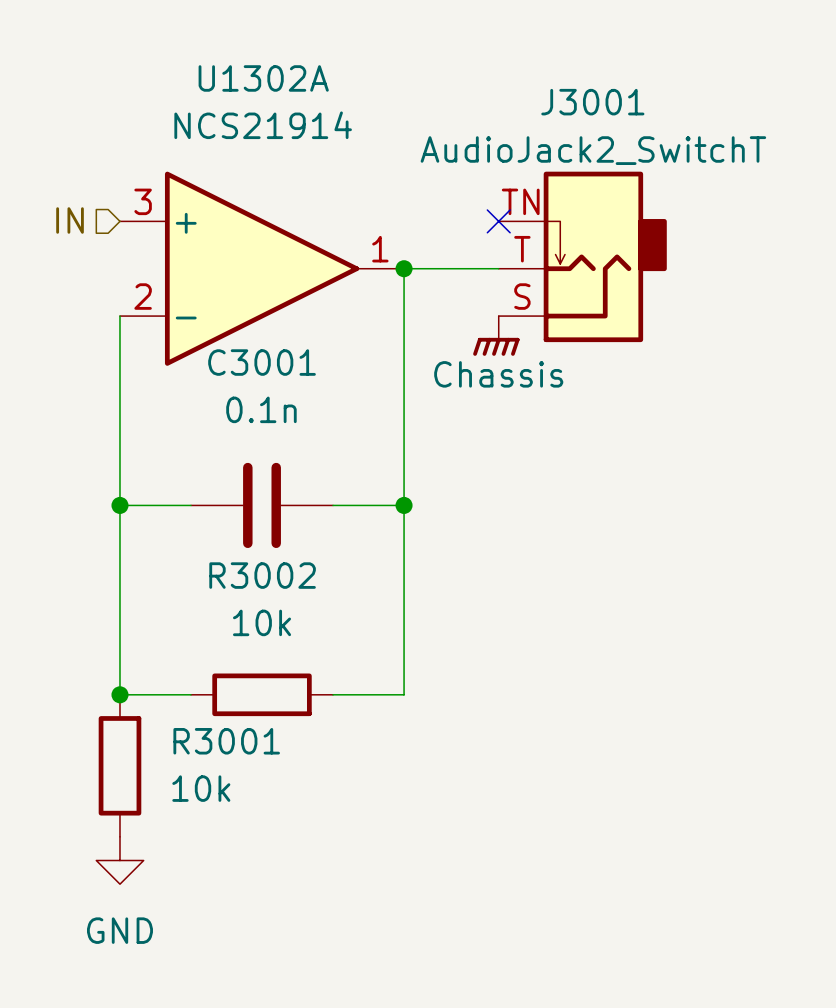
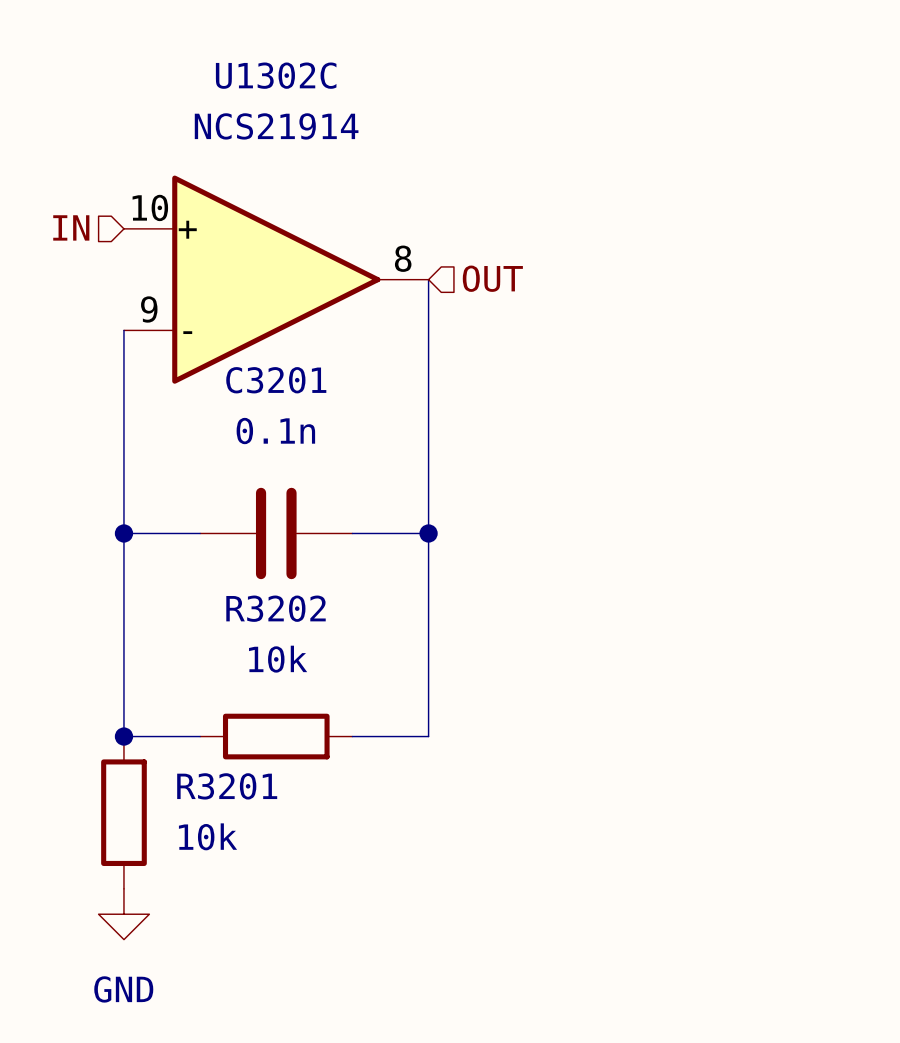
U1302A name: U1302A (263, 78) -> U1302C (276, 75)
U1302A pin number: 3 (143, 201) -> 10 (150, 207)
no-connect mark: (498, 221) -> none
U1302A pin number: 1 (380, 249) -> 8 (403, 258)
J3001: AudioJack2_SwitchT (582, 256) -> none
hierarchical label: none -> OUT (492, 278)
wire: (404, 268) (498, 268) -> none
junction: (404, 268) -> none
U1302A pin number: 2 (143, 296) -> 9 (149, 309)
power symbol: Chassis (496, 335) -> none
C3001 name: C3001 (262, 362) -> C3201 (276, 380)
R3002 name: R3002 (262, 575) -> R3202 (276, 608)
R3001 name: R3001 (226, 741) -> R3201 (227, 786)

